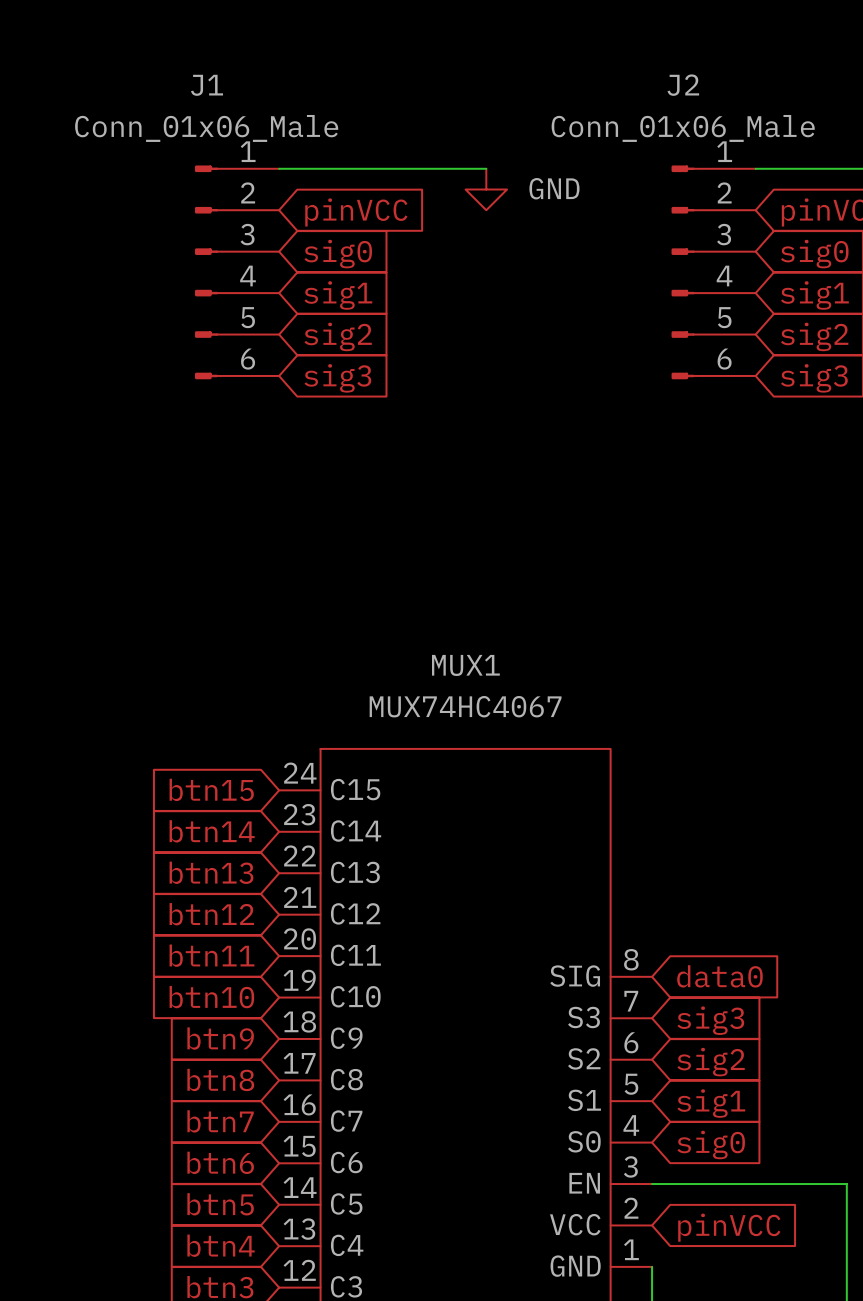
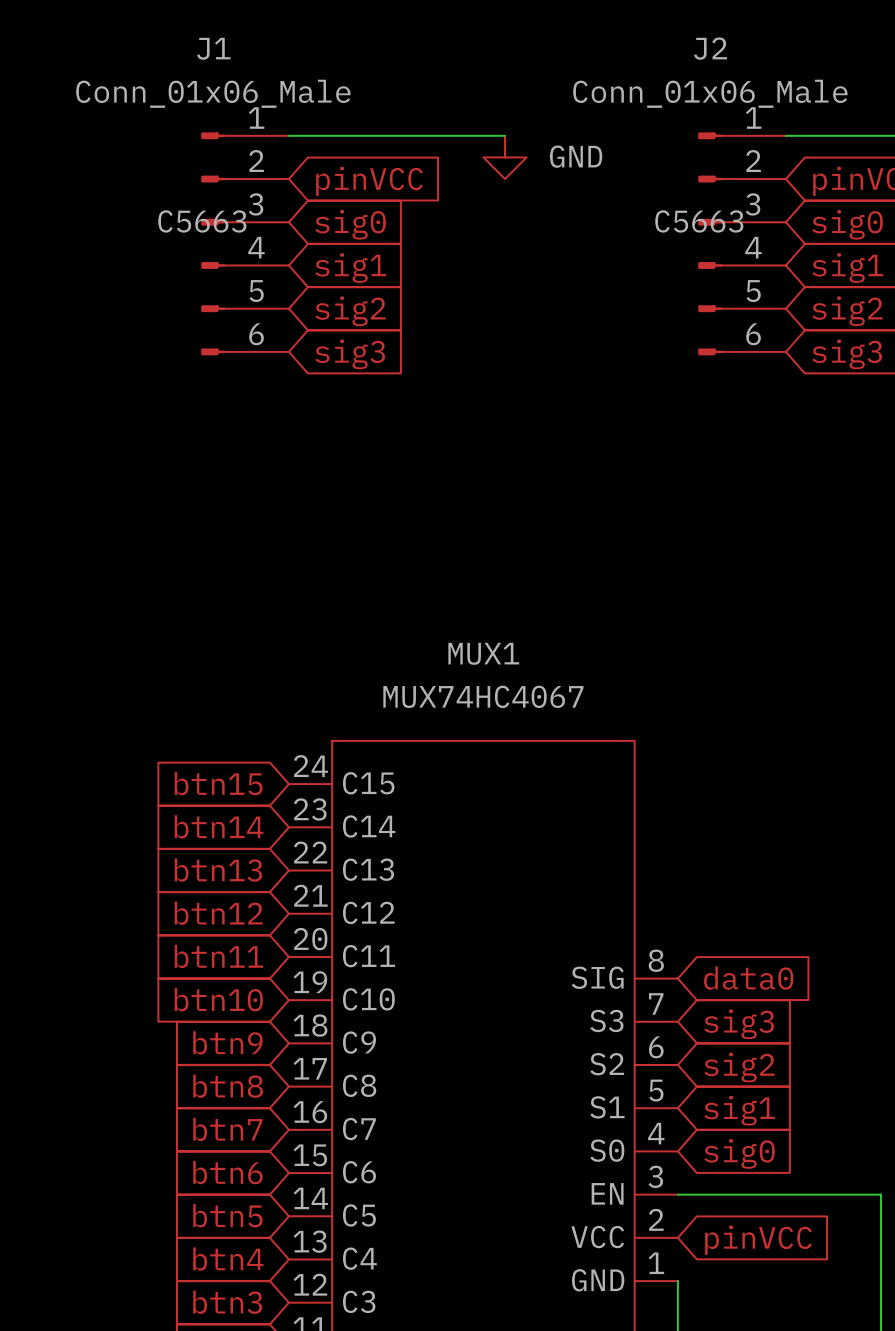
J1 text: none -> C5663 (202, 221)
J2 text: none -> C5663 (699, 221)

